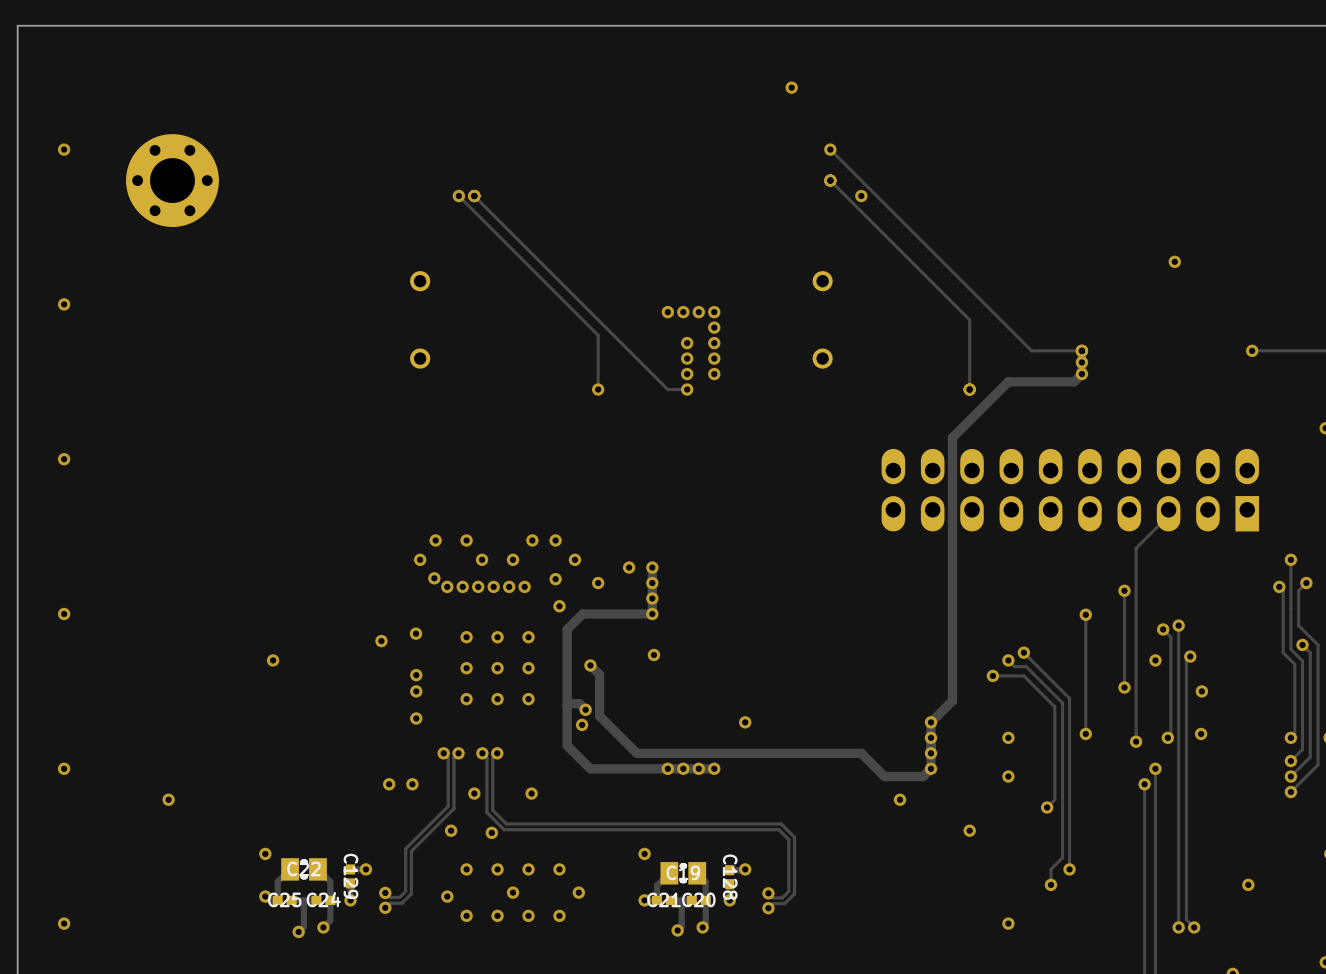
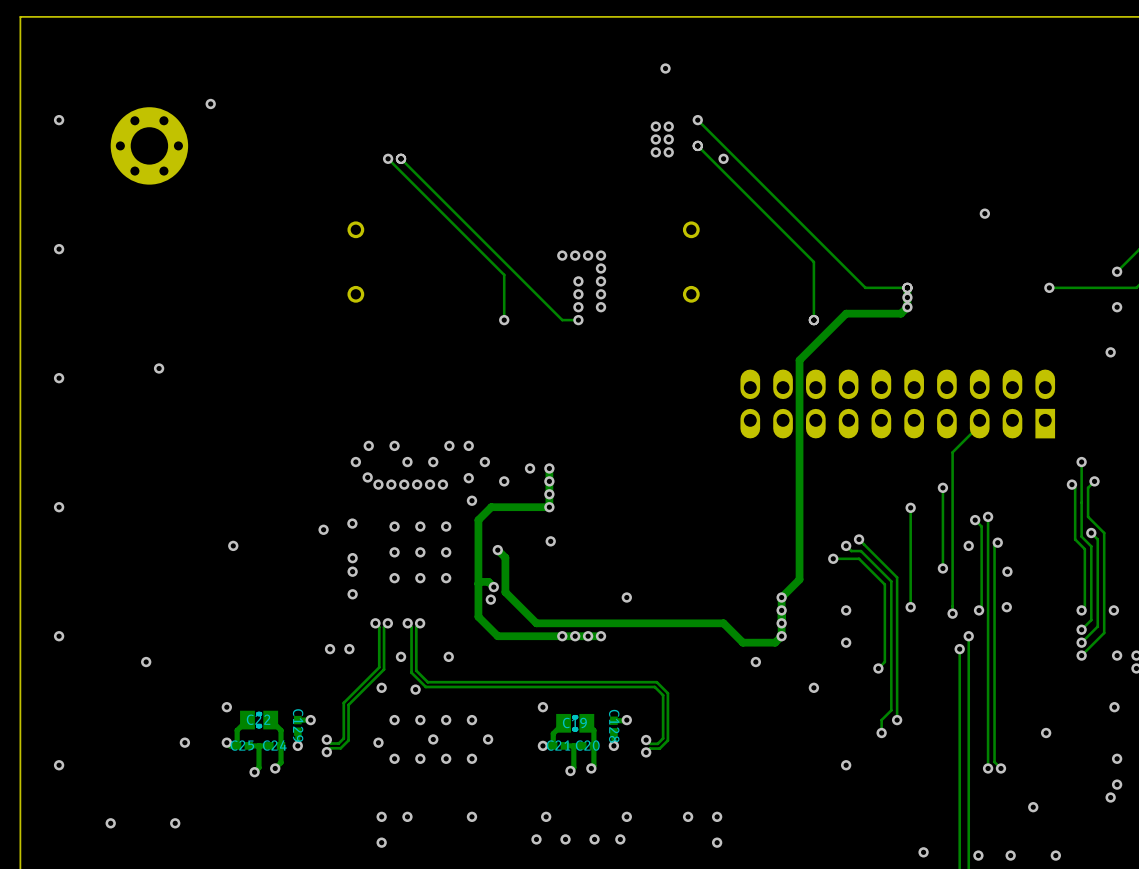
via: none -> (210, 103)
via: none -> (655, 126)
via: none -> (668, 126)
via: none -> (655, 139)
via: none -> (668, 139)
via: none -> (655, 152)
via: none -> (668, 152)
via: none -> (159, 368)
via: none -> (184, 742)

